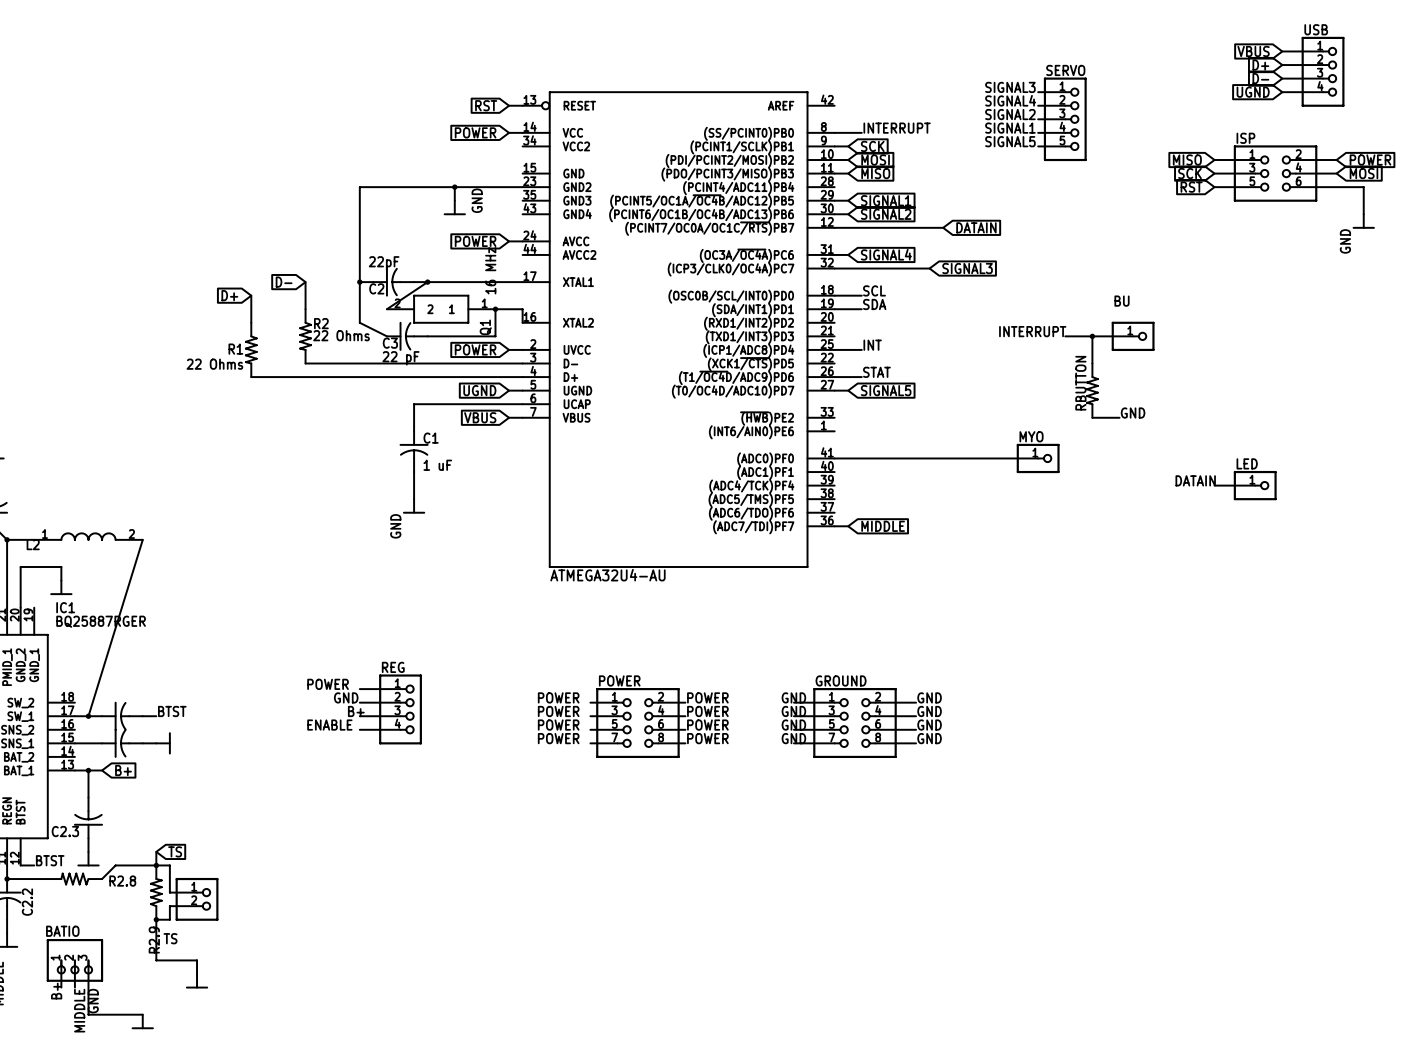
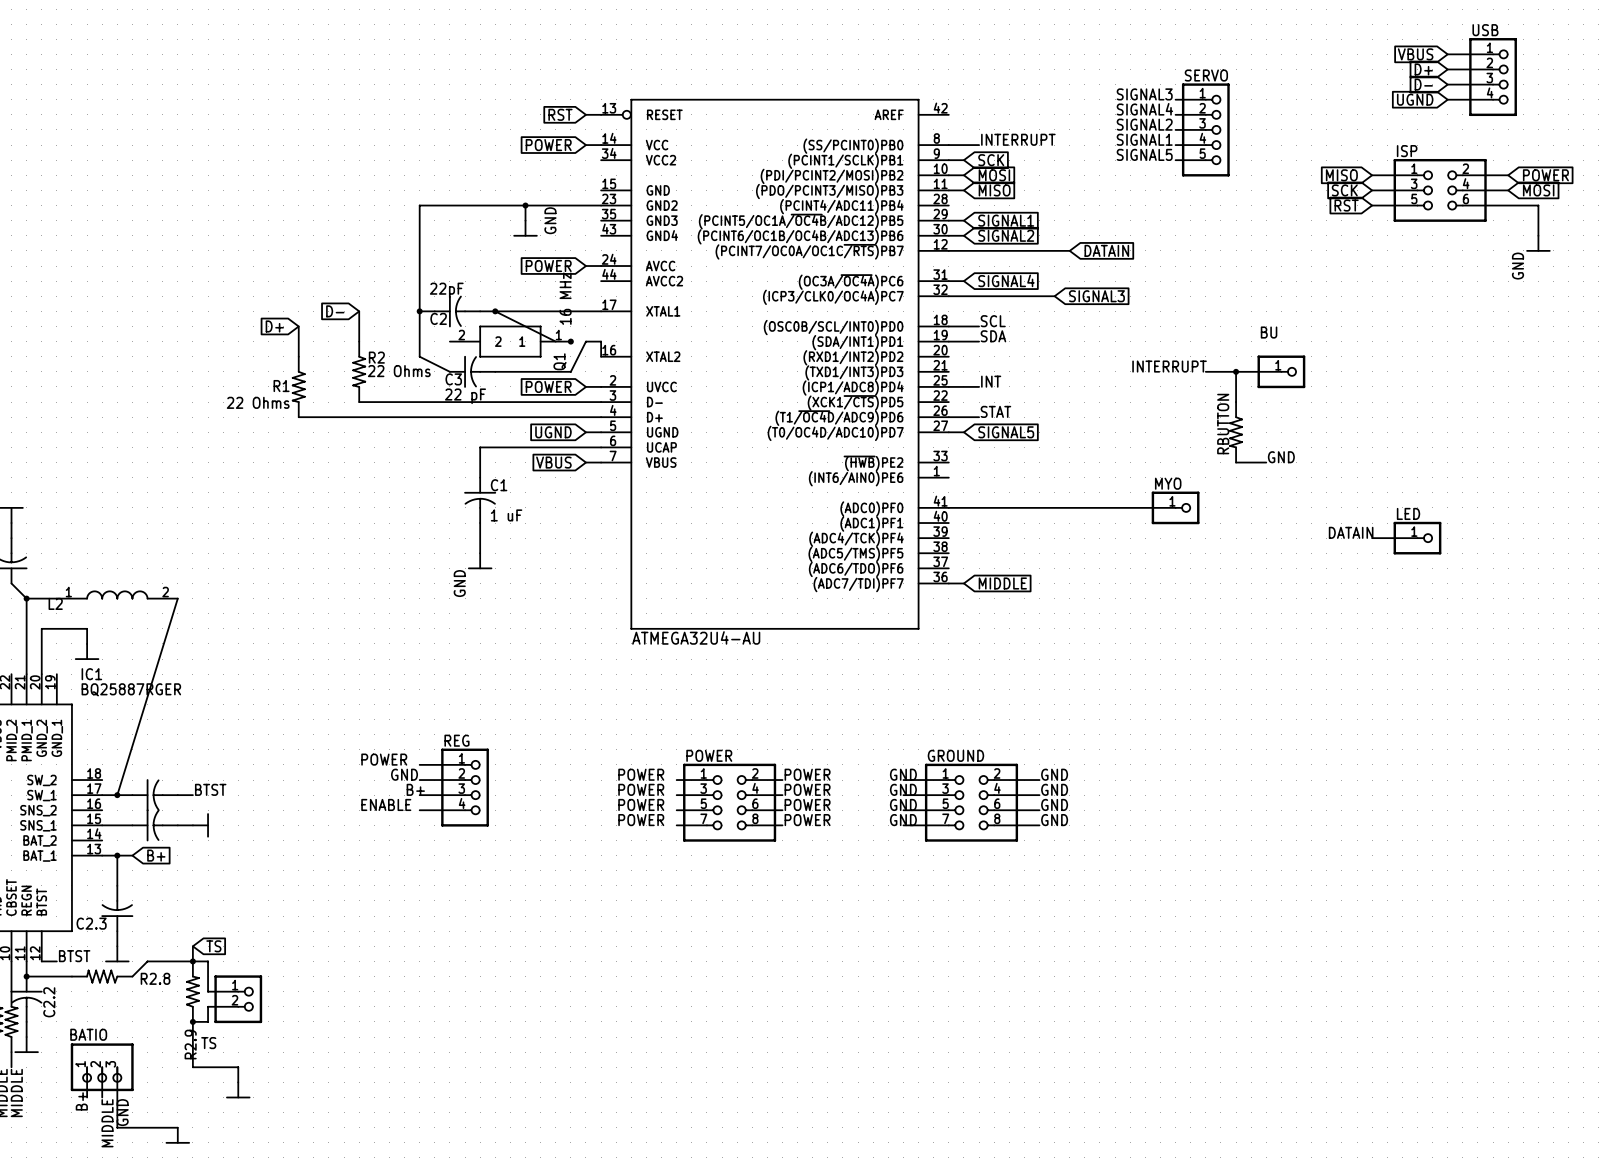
wire: (427, 282) (386, 309) -> (495, 311) (555, 341)
wire: (509, 309) (495, 309) (495, 336) -> (585, 341) (570, 371)

